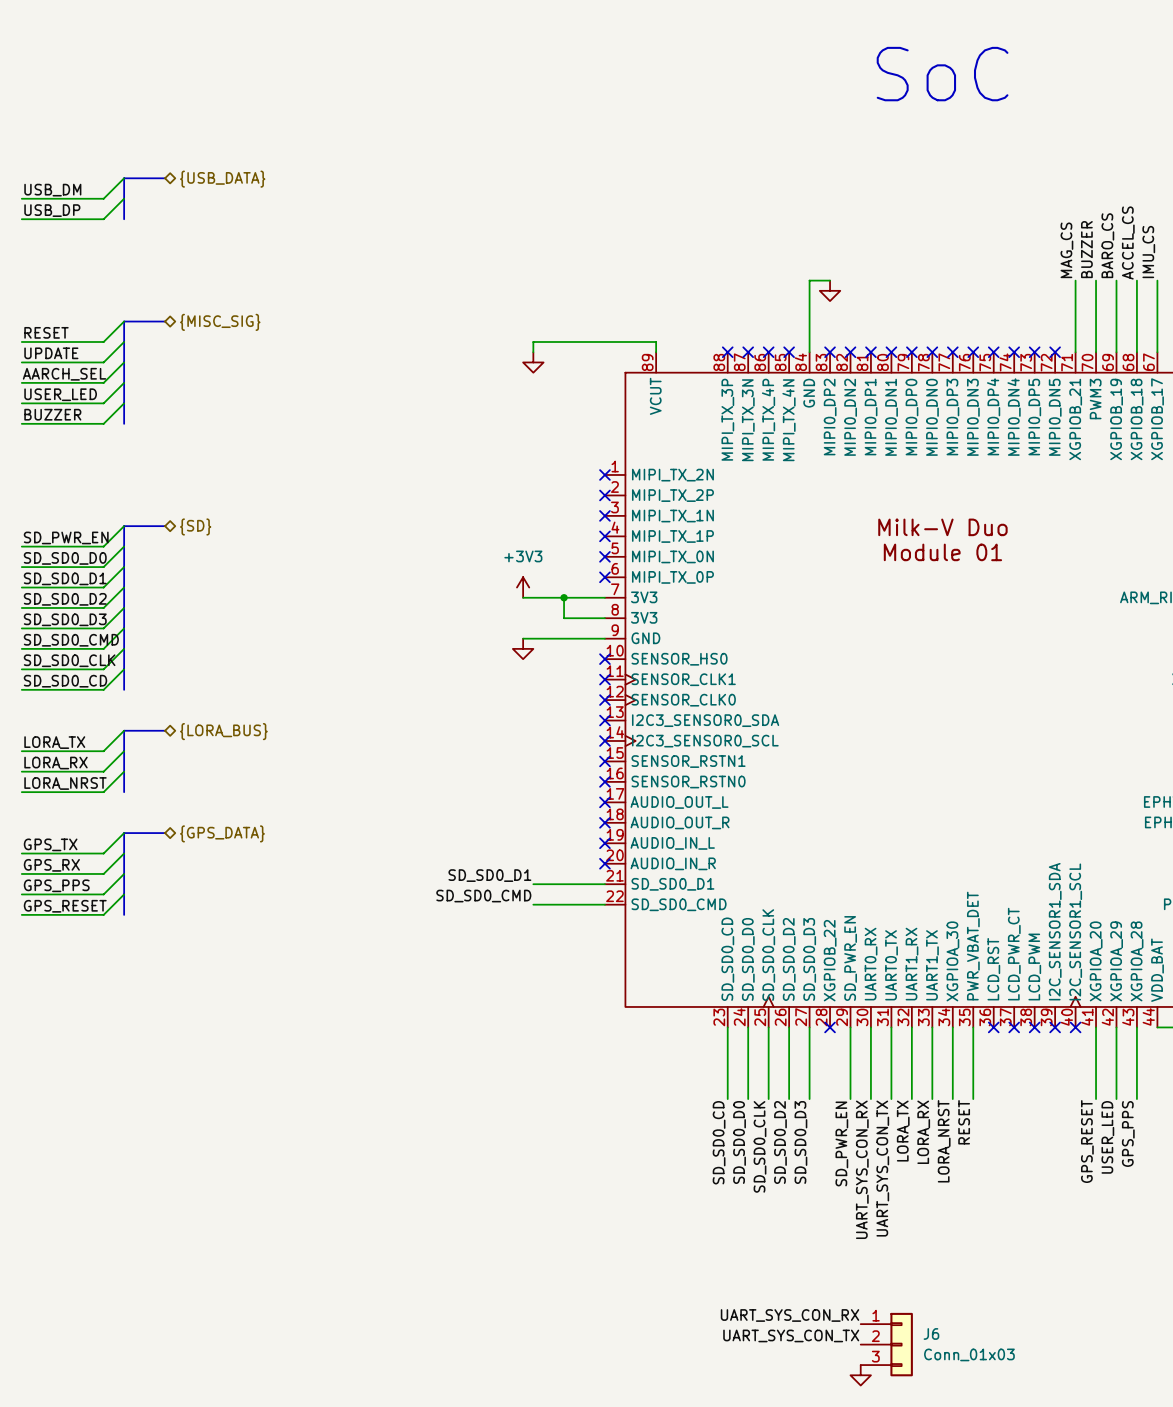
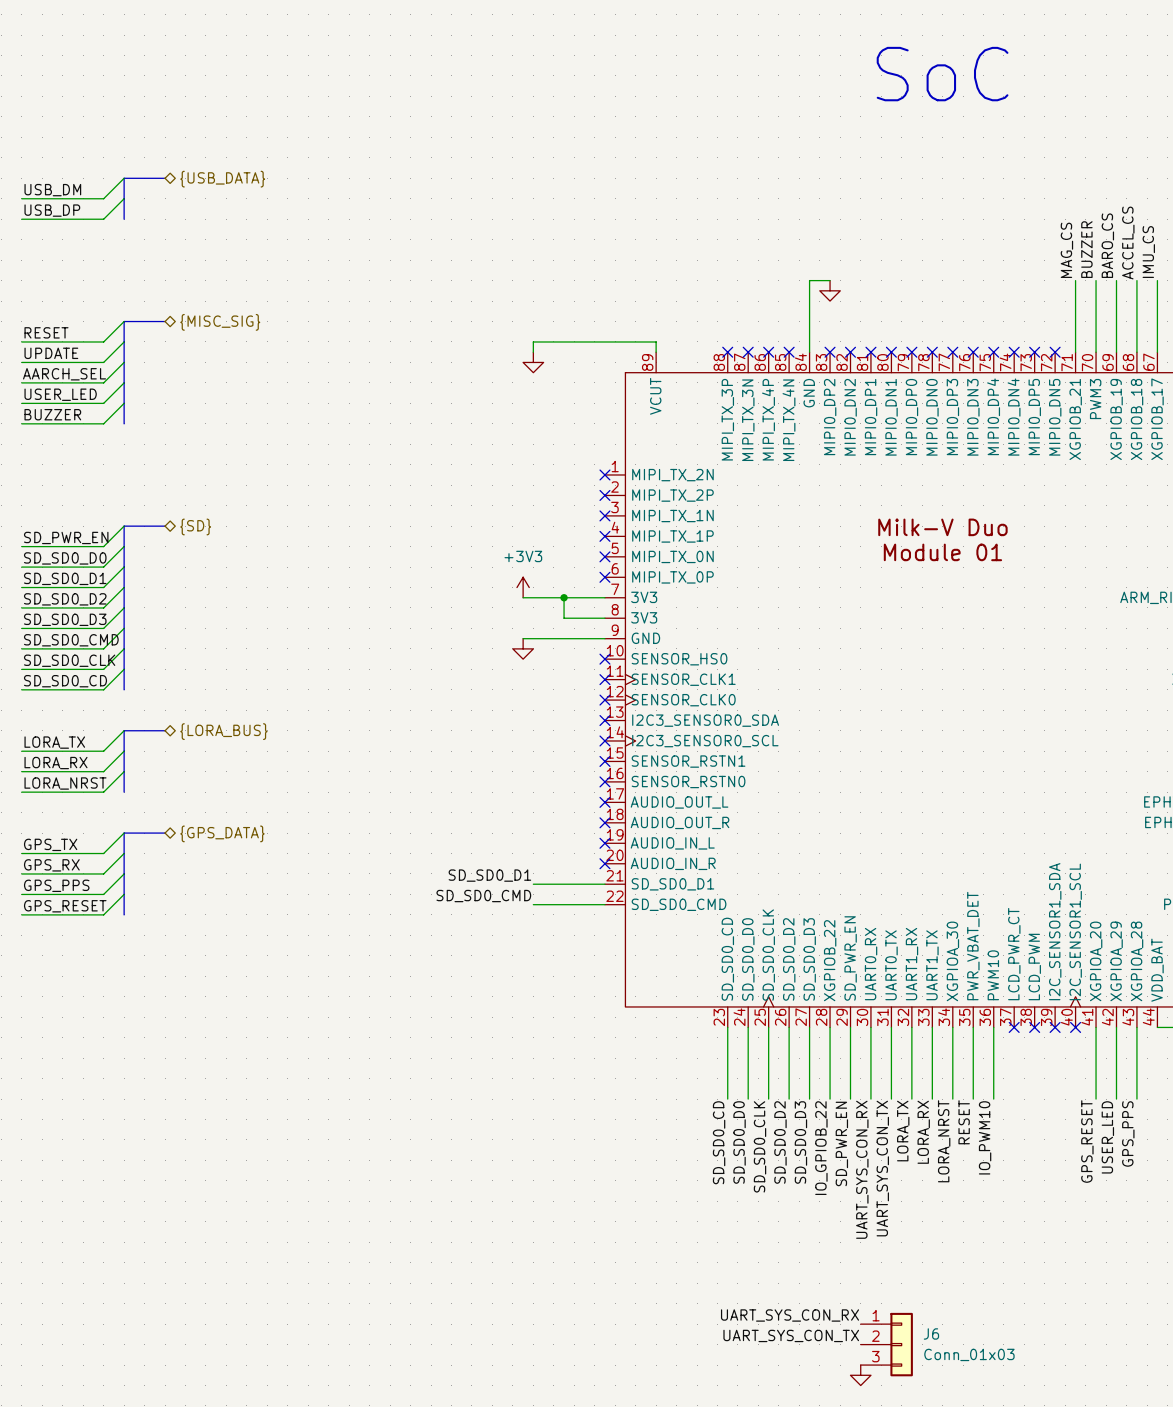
part pin name: LCD_RST (993, 969) -> PWM10 (993, 975)
wire: none -> (830, 1027) (830, 1099)
no-connect mark: (830, 1027) -> none
wire: none -> (993, 1027) (993, 1099)
no-connect mark: (993, 1027) -> none
label: none -> IO_PWM10 (985, 1137)
label: none -> IO_GPIOB_22 (821, 1148)

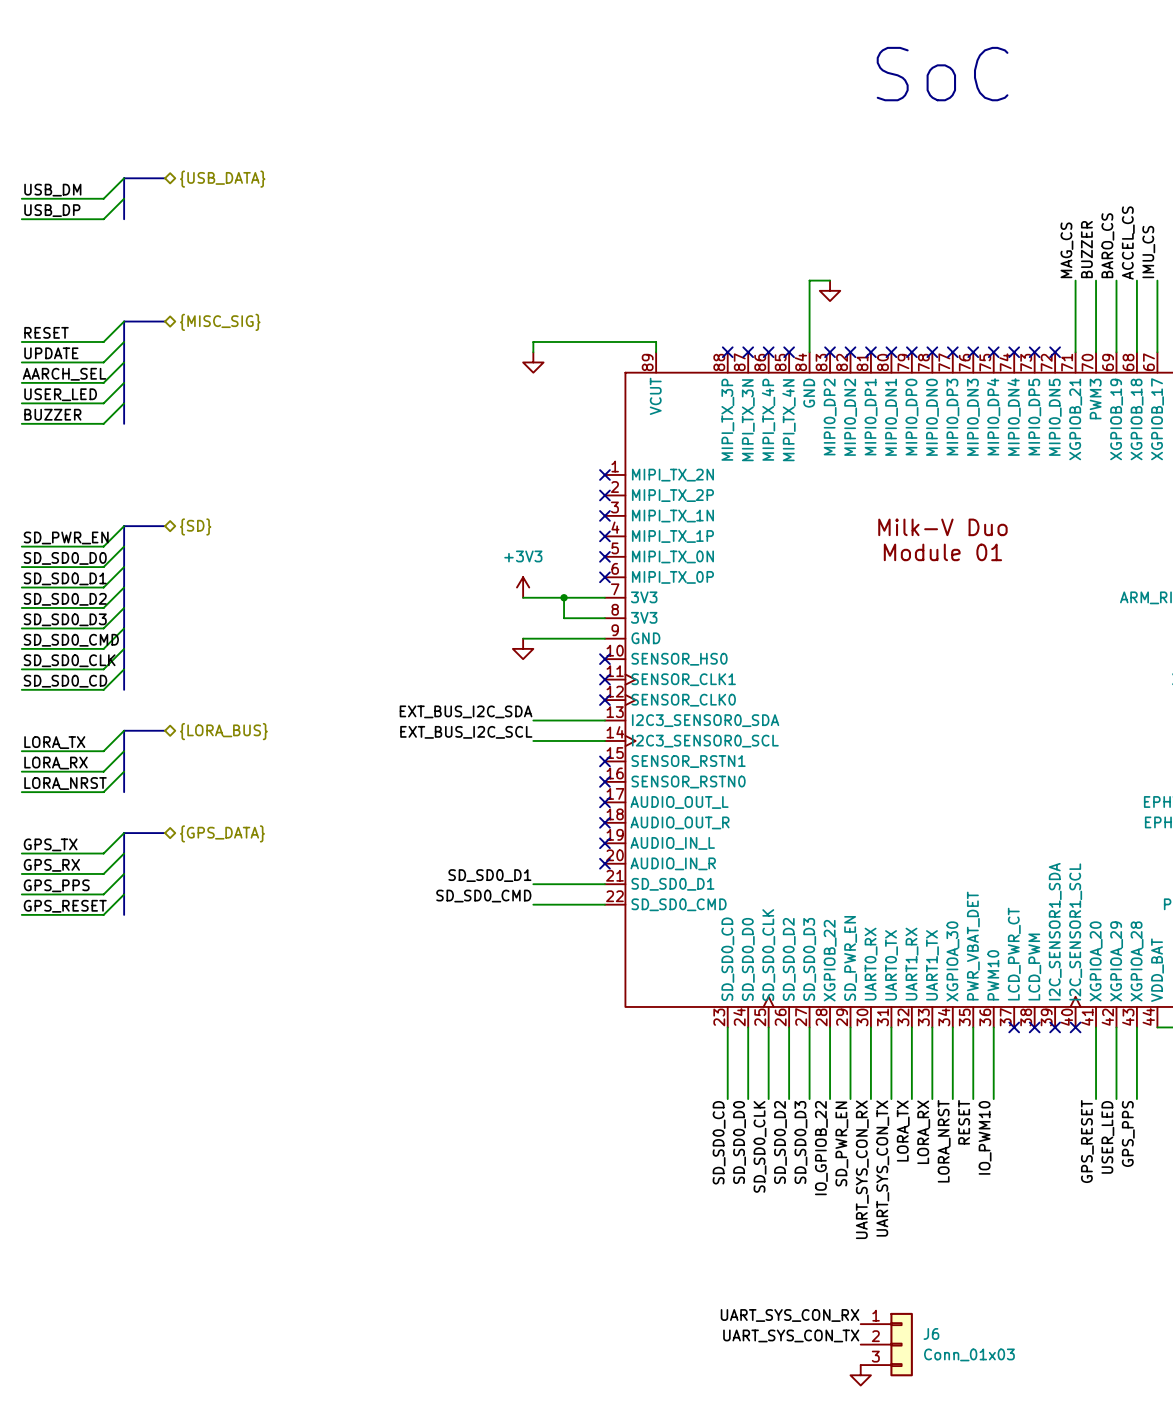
label: none -> EXT_BUS_I2C_SDA (466, 711)
wire: none -> (533, 720) (604, 720)
no-connect mark: (604, 720) -> none
label: none -> EXT_BUS_I2C_SCL (466, 732)
wire: none -> (533, 740) (604, 740)
no-connect mark: (604, 740) -> none

